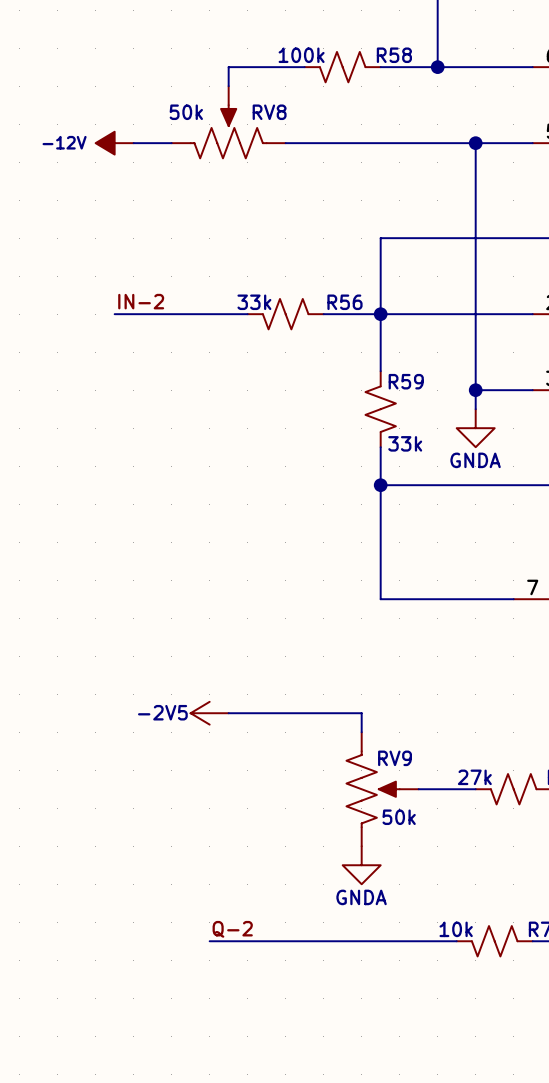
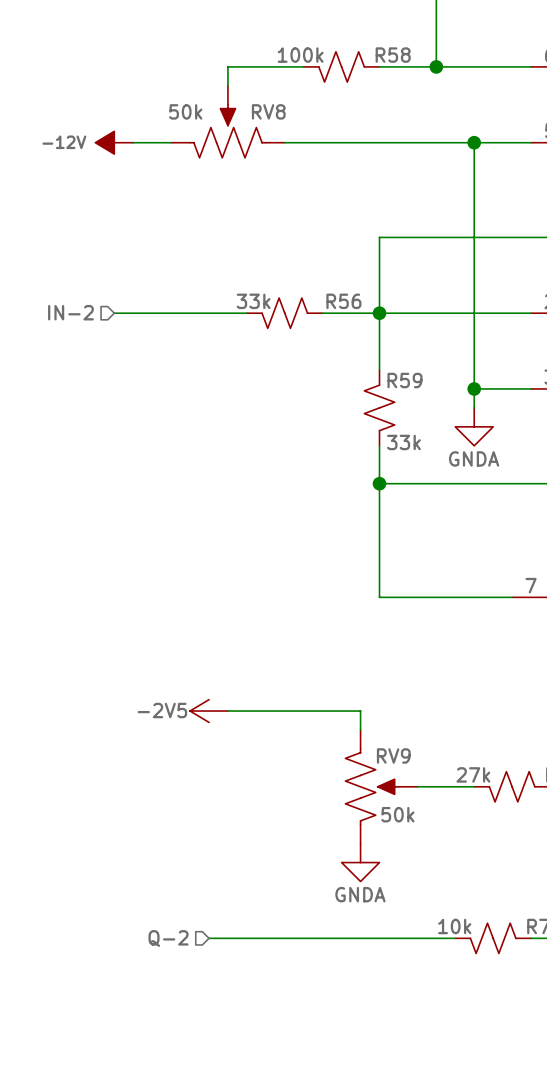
label: IN-2 (141, 301) -> none
hierarchical label: none -> IN-2 (70, 312)
label: Q-2 (232, 929) -> none
hierarchical label: none -> Q-2 (168, 938)

